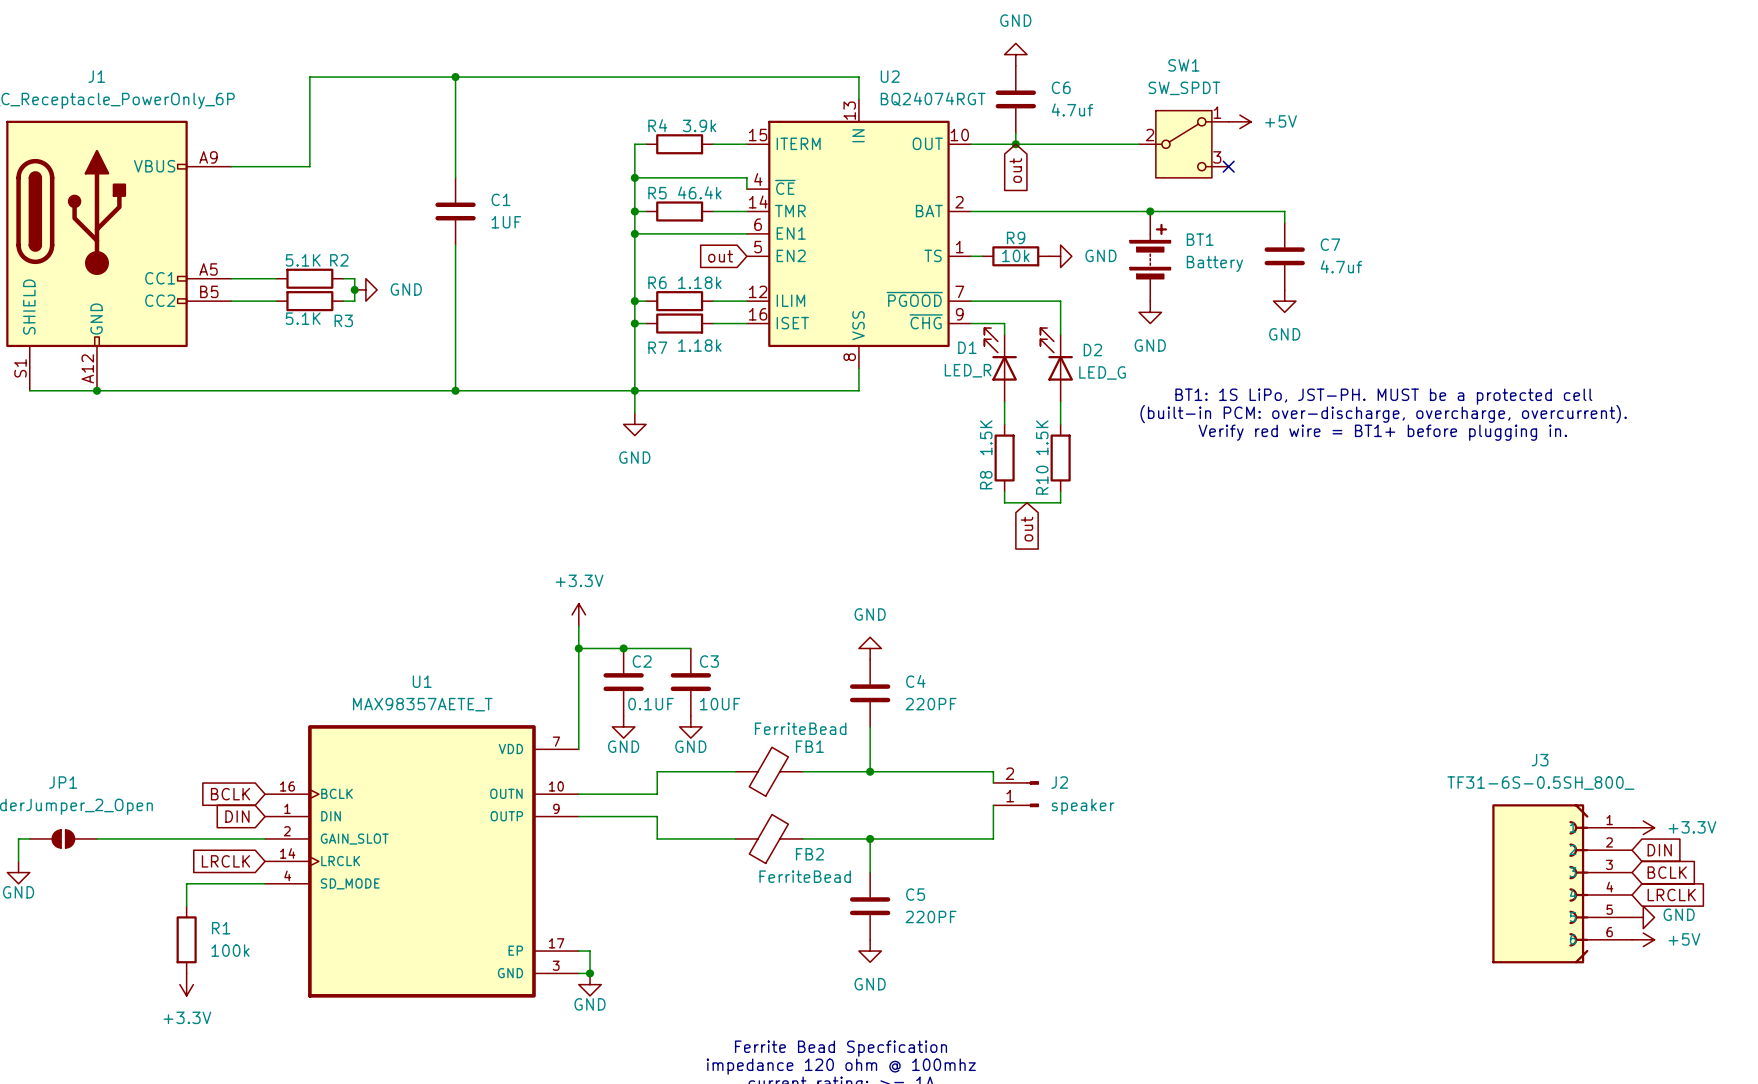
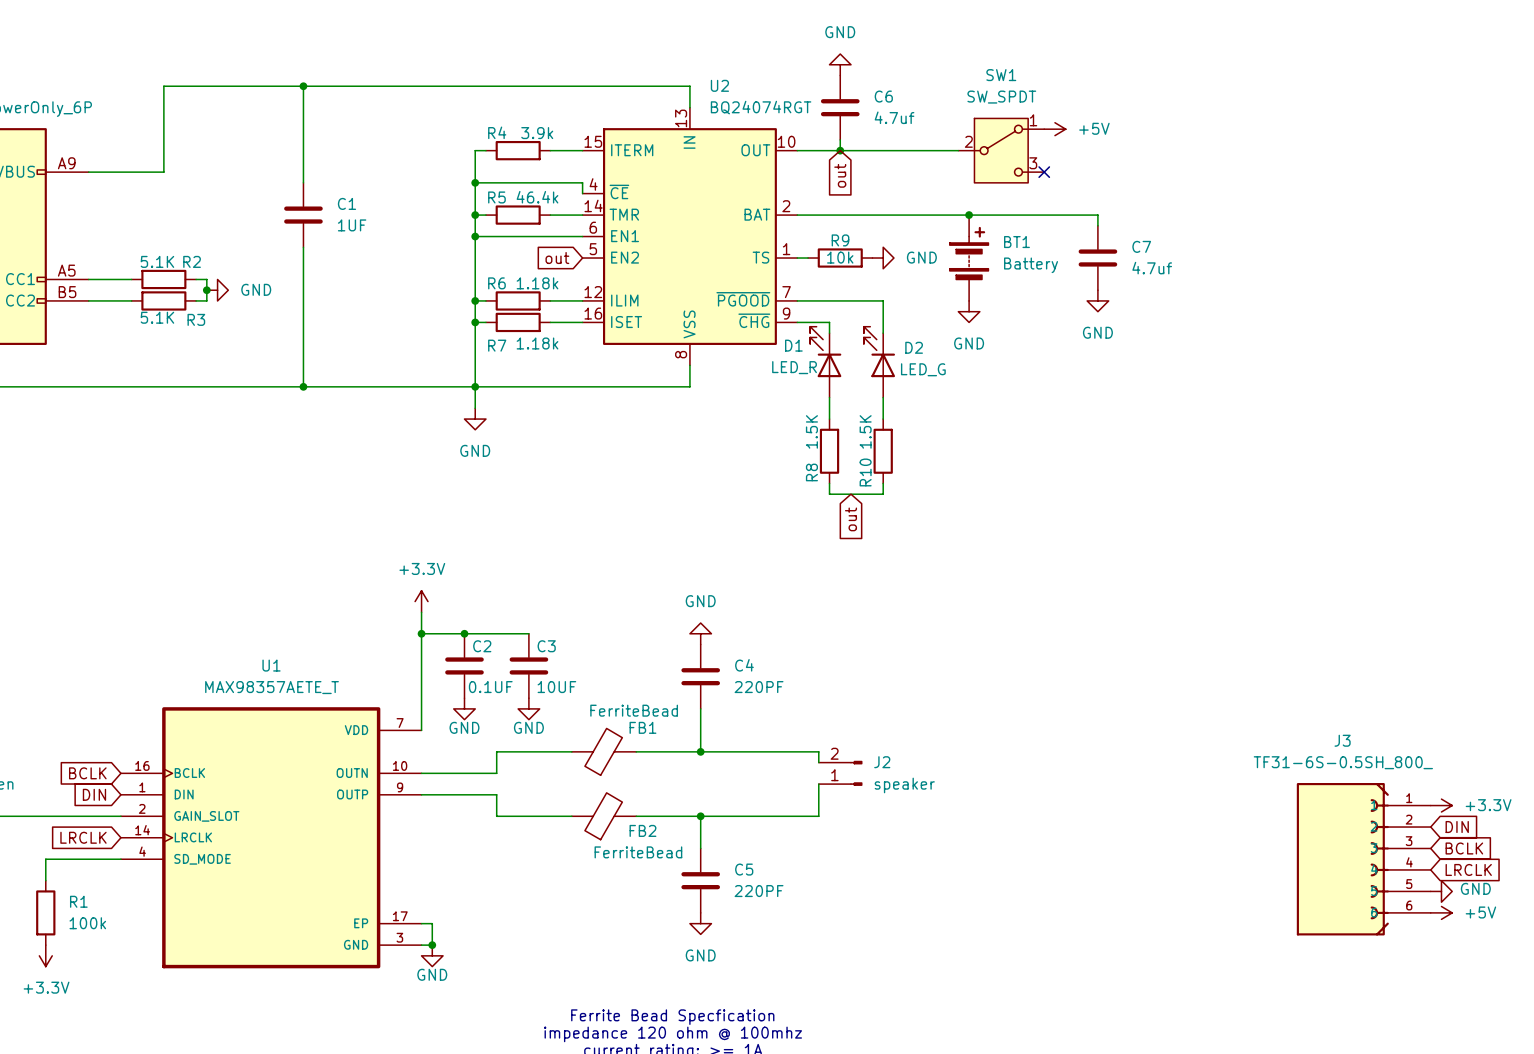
text: BT1: 1S LiPo, JST-PH. MUST be a protected cell (1383, 396) -> none
text: (built-in PCM: over-discharge, overcharge, overcurrent). (1383, 414) -> none
text: Verify red wire = BT1+ before plugging in. (1382, 432) -> none

